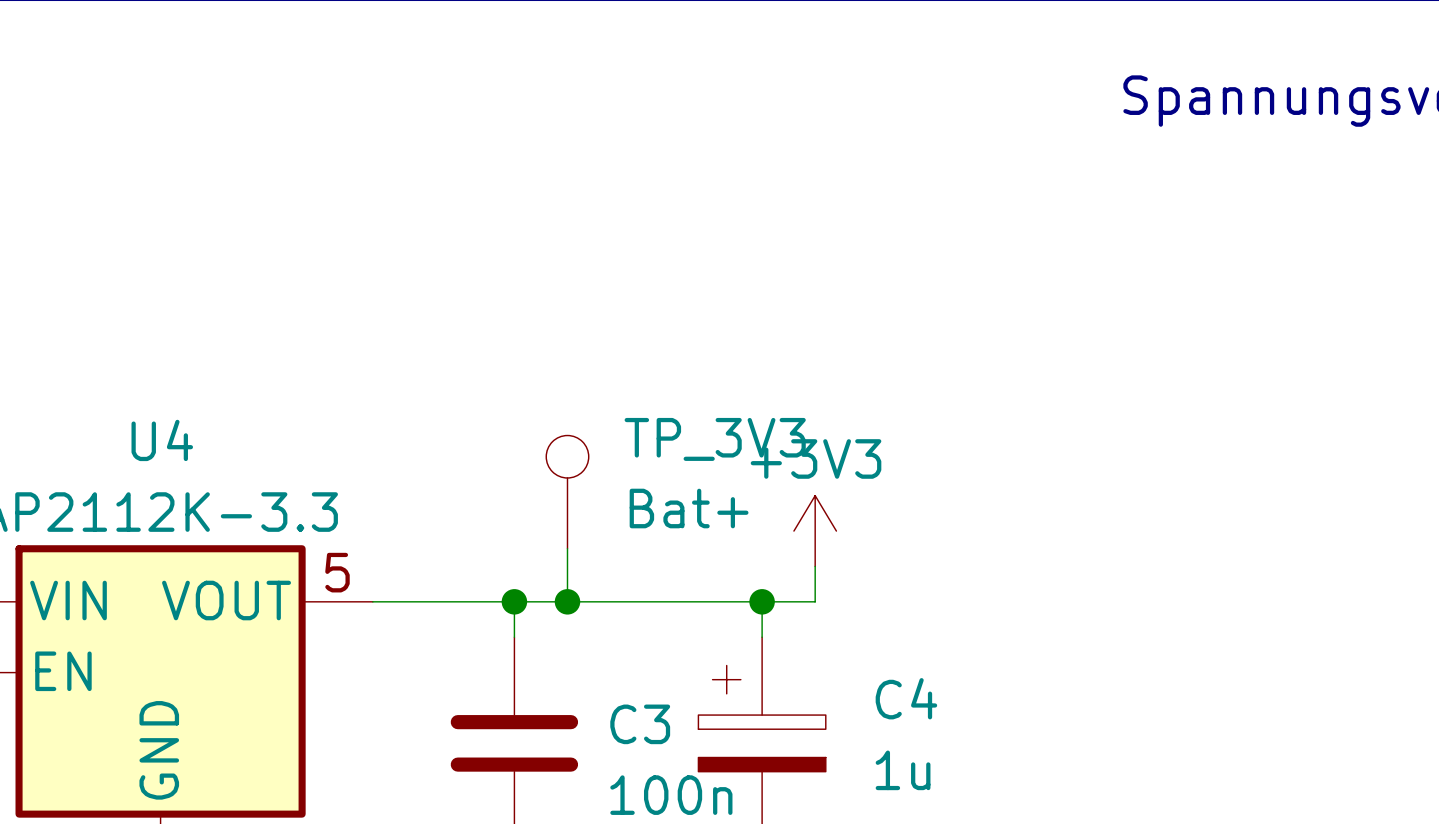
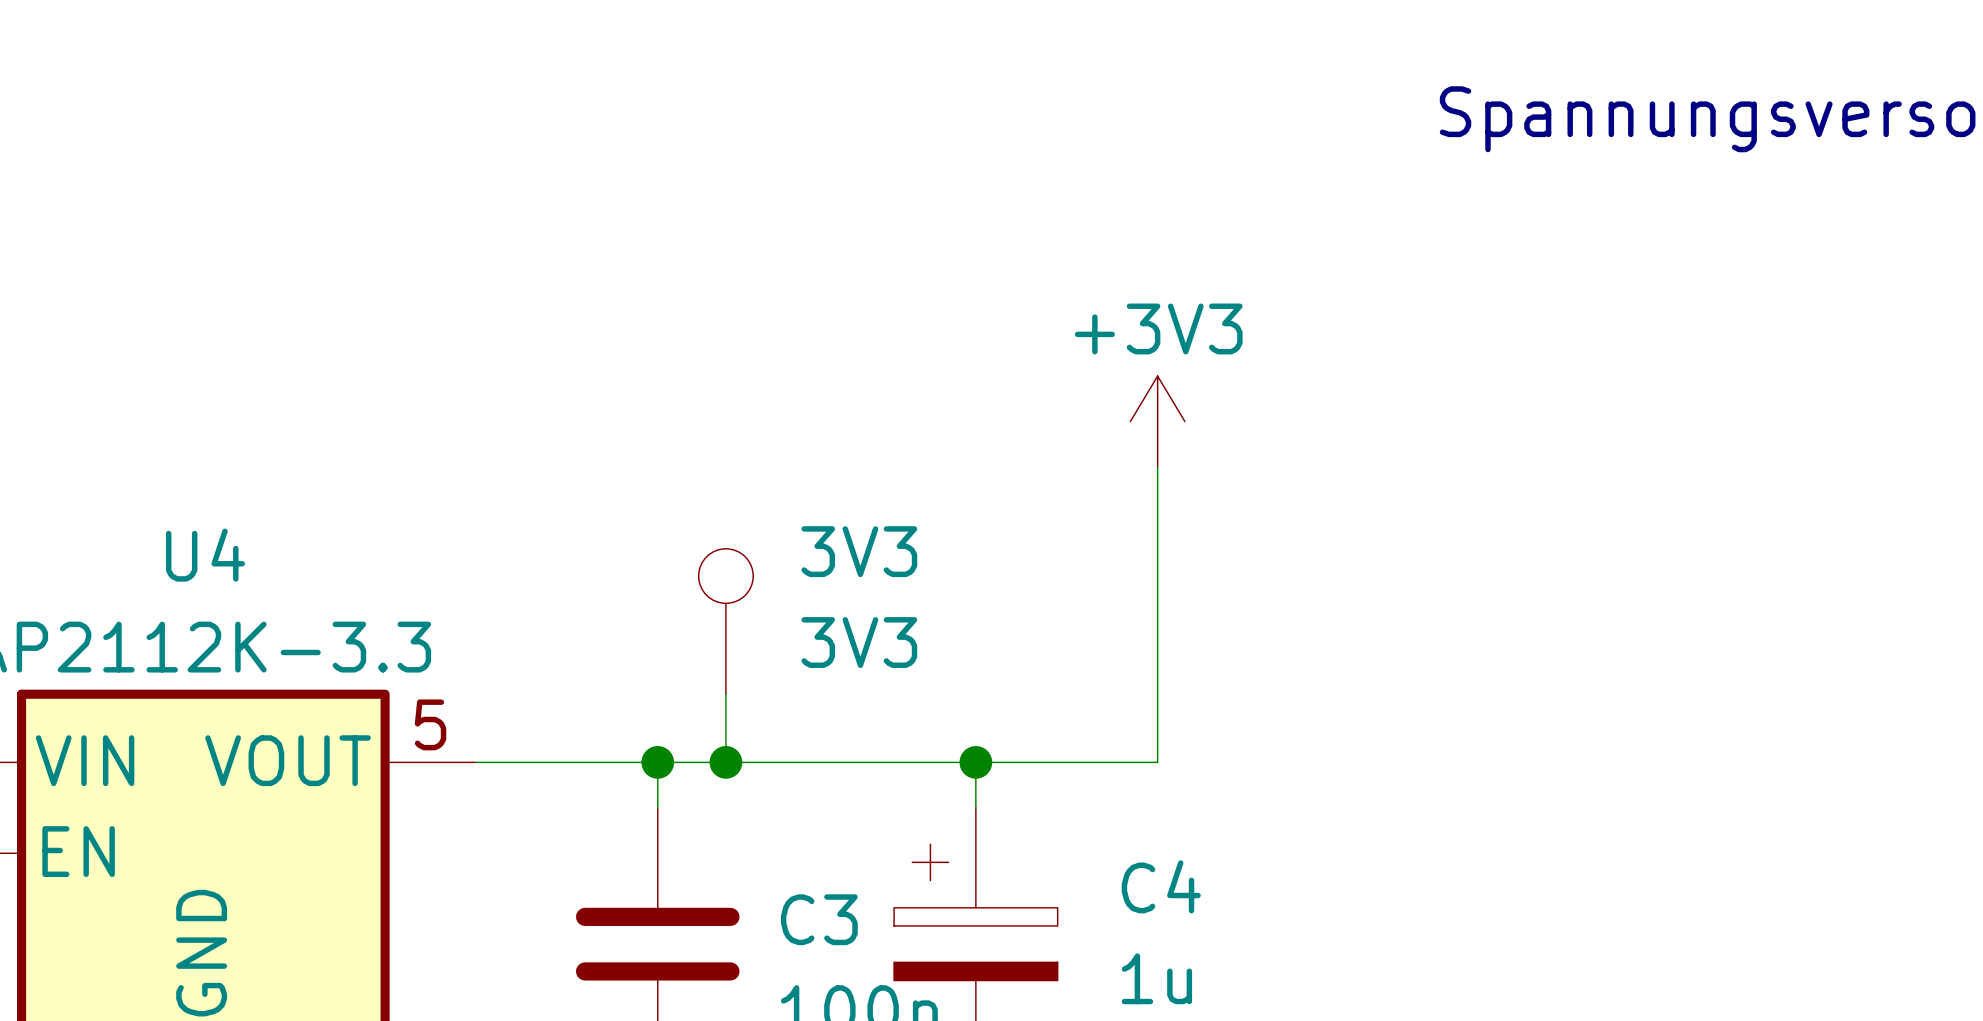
TP_3V3 name: TP_3V3 (715, 439) -> 3V3 (859, 551)
TP_3V3 value: Bat+ (689, 508) -> 3V3 (859, 642)
power symbol position: +3V3 (815, 531) -> +3V3 (1157, 421)
wire: (815, 566) (815, 601) -> (1157, 467) (1157, 762) (1044, 762)

